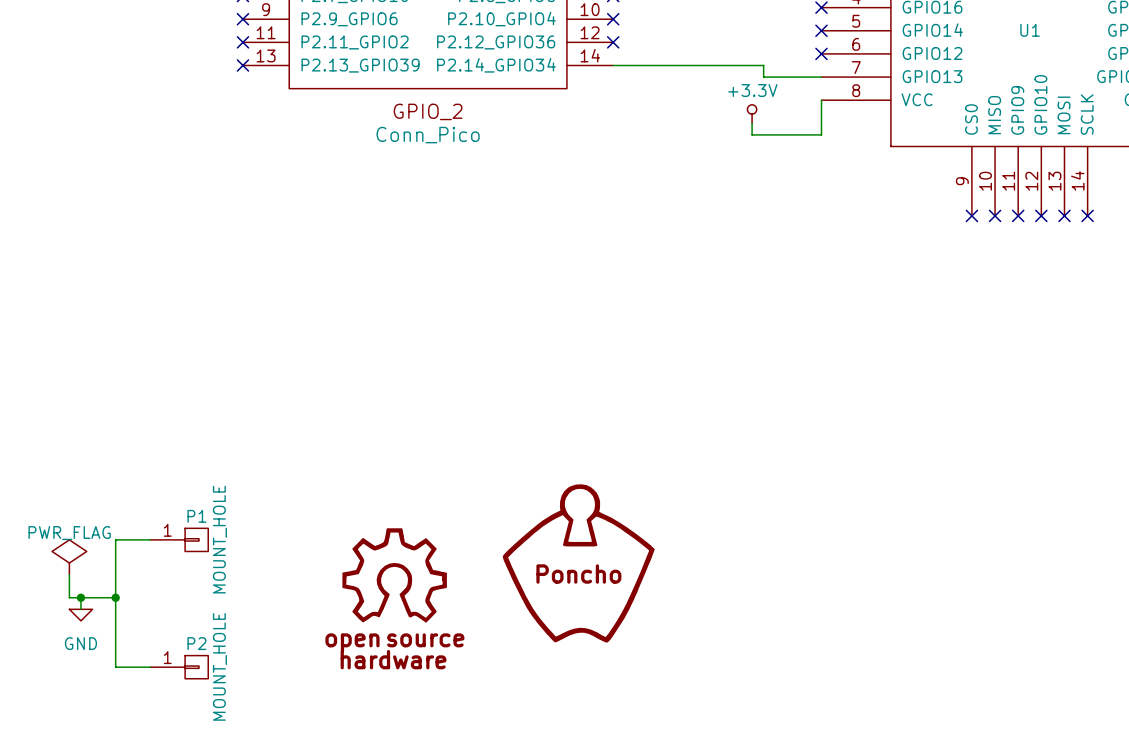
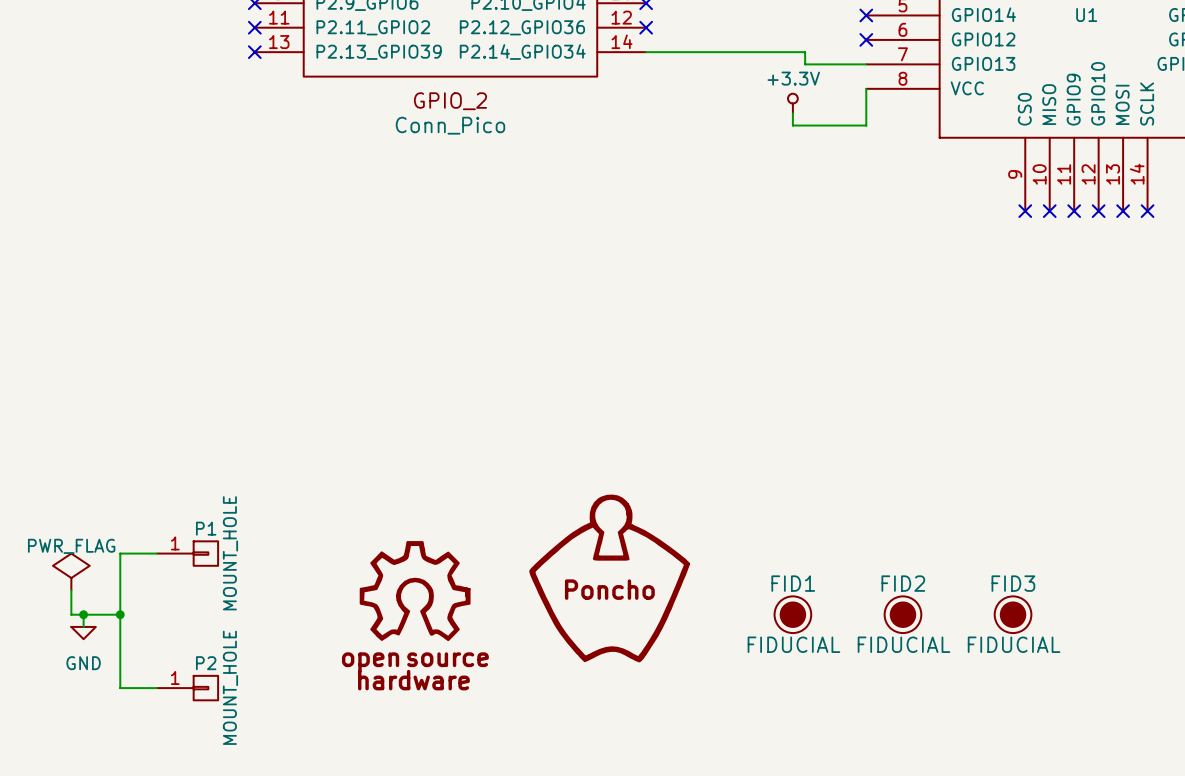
FID1: none -> FIDUCIAL (792, 614)
FID2: none -> FIDUCIAL (902, 614)
FID3: none -> FIDUCIAL (1013, 614)

